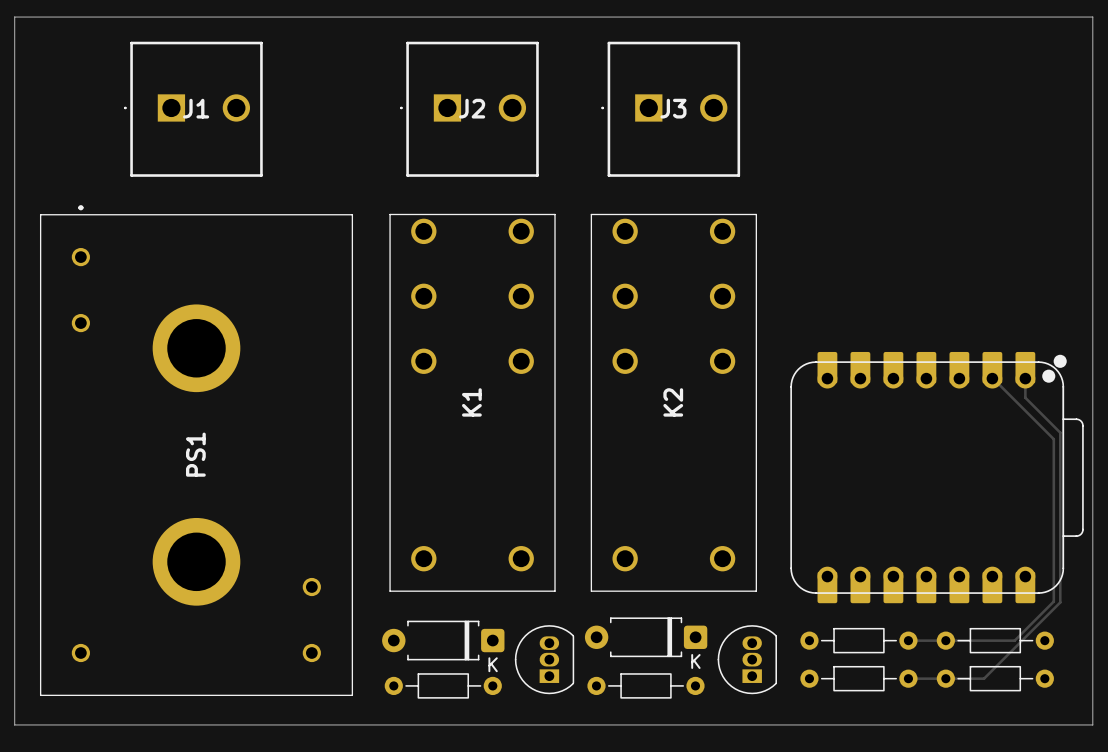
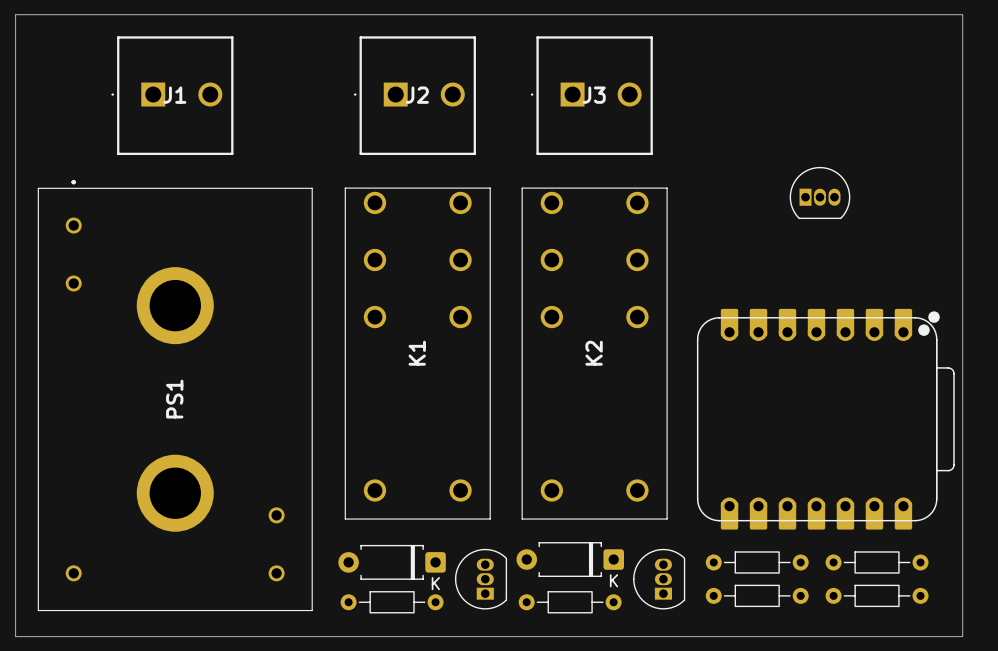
part: none -> (819, 192)
track: (992, 367) (992, 377) (1053, 439) (1053, 601) (1014, 640) (908, 640) -> none
track: (1025, 378) (1025, 397) (1060, 432) (1060, 602) (984, 678) (908, 678) -> none

